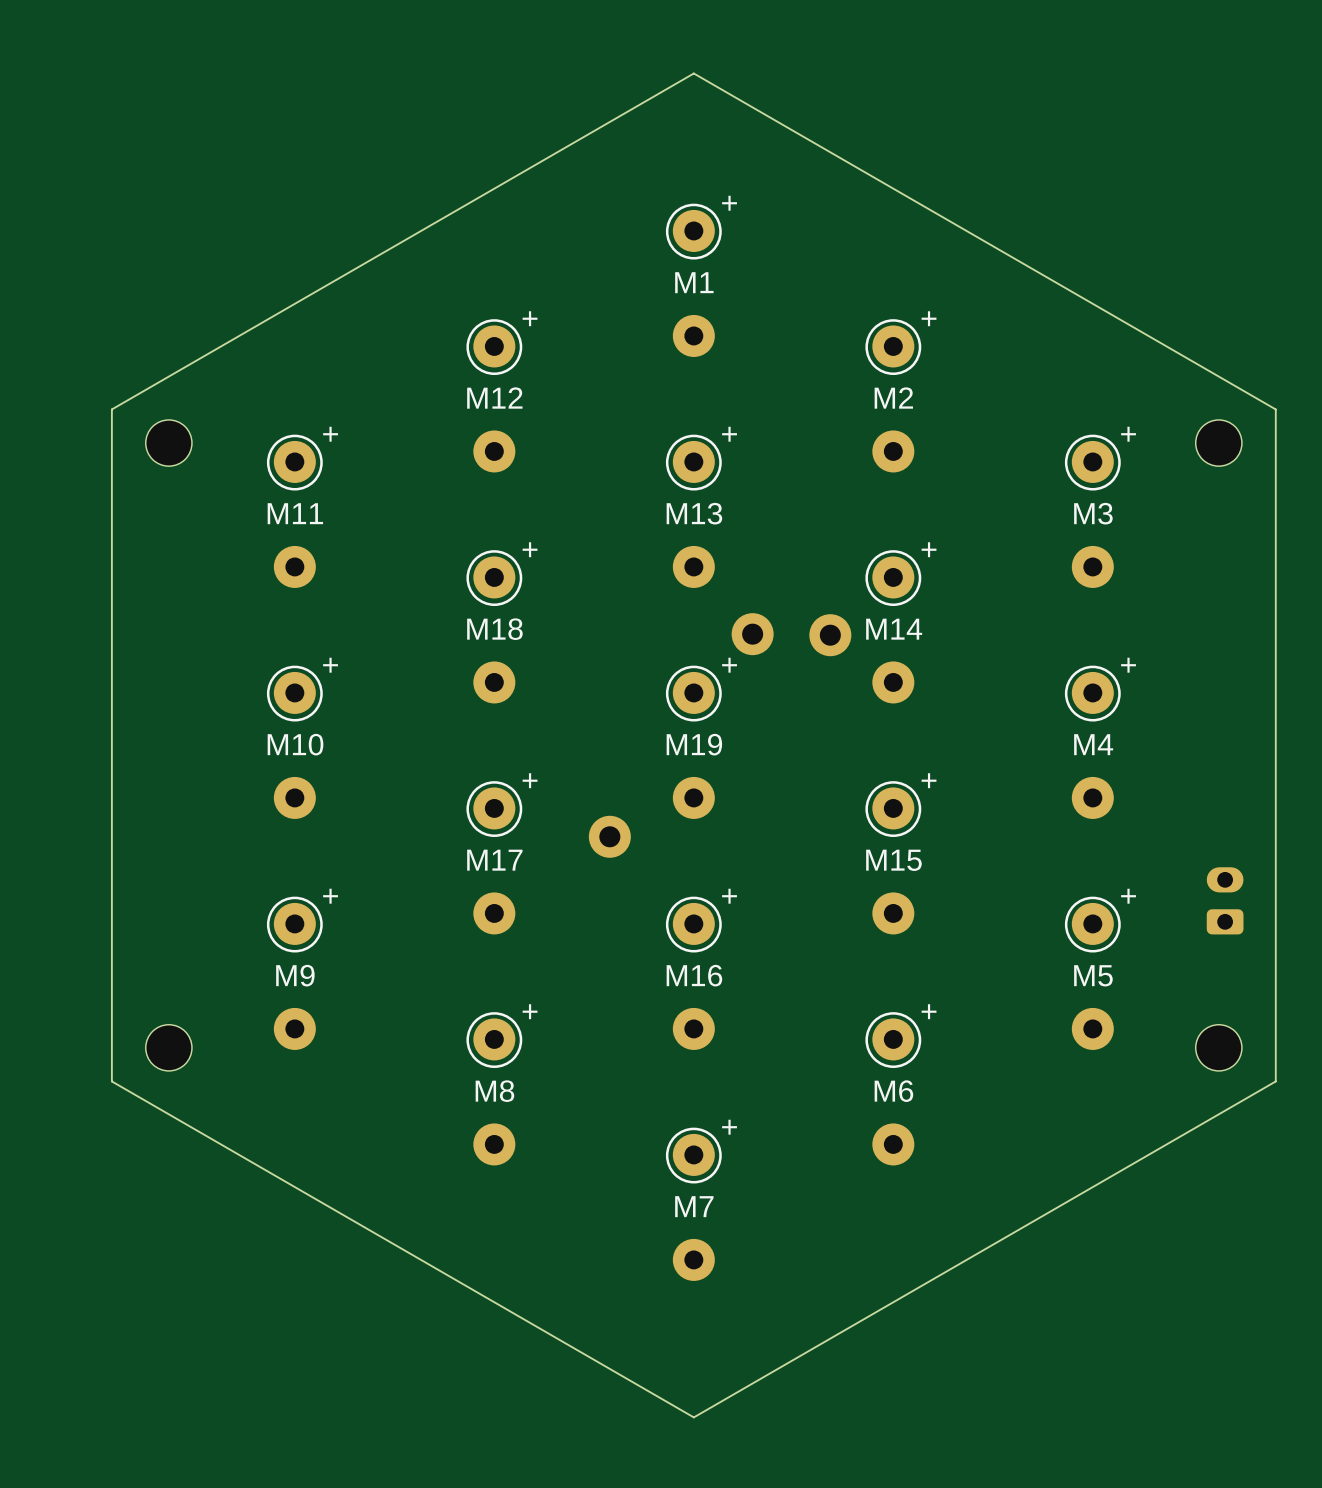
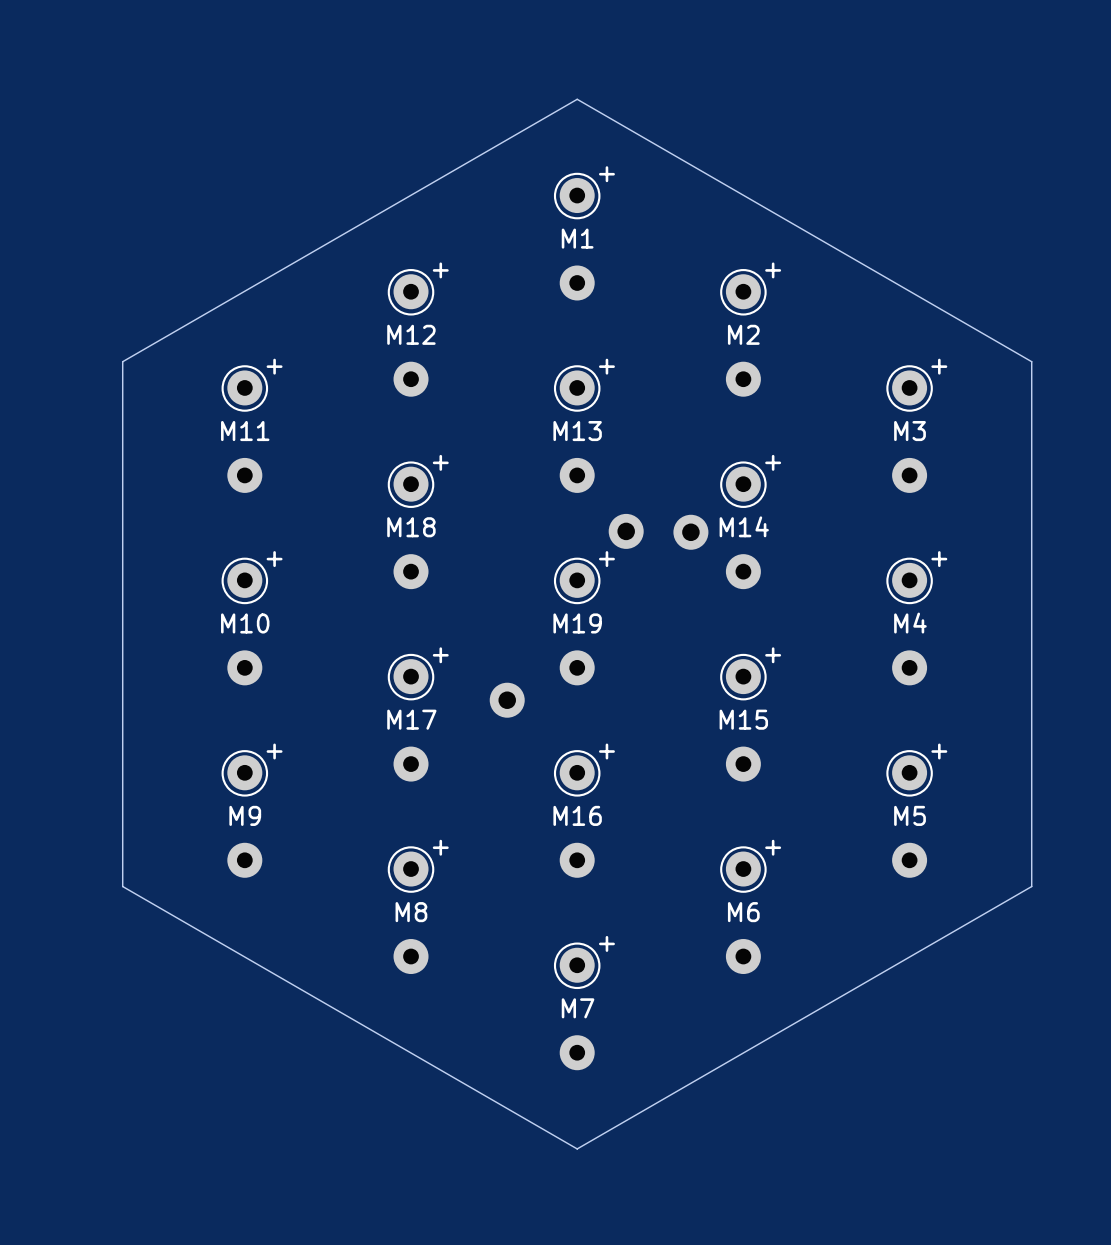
board edge: (693, 73) (111, 409) (111, 1081) (693, 1417) (1275, 1081) (1275, 409) (693, 73) -> (577, 99) (122, 361) (122, 886) (577, 1148) (1031, 886) (1031, 361) (577, 99)
part: (168, 443) -> none
part: (1218, 443) -> none
part: (1225, 900) -> none
part: (168, 1047) -> none
part: (1218, 1047) -> none

